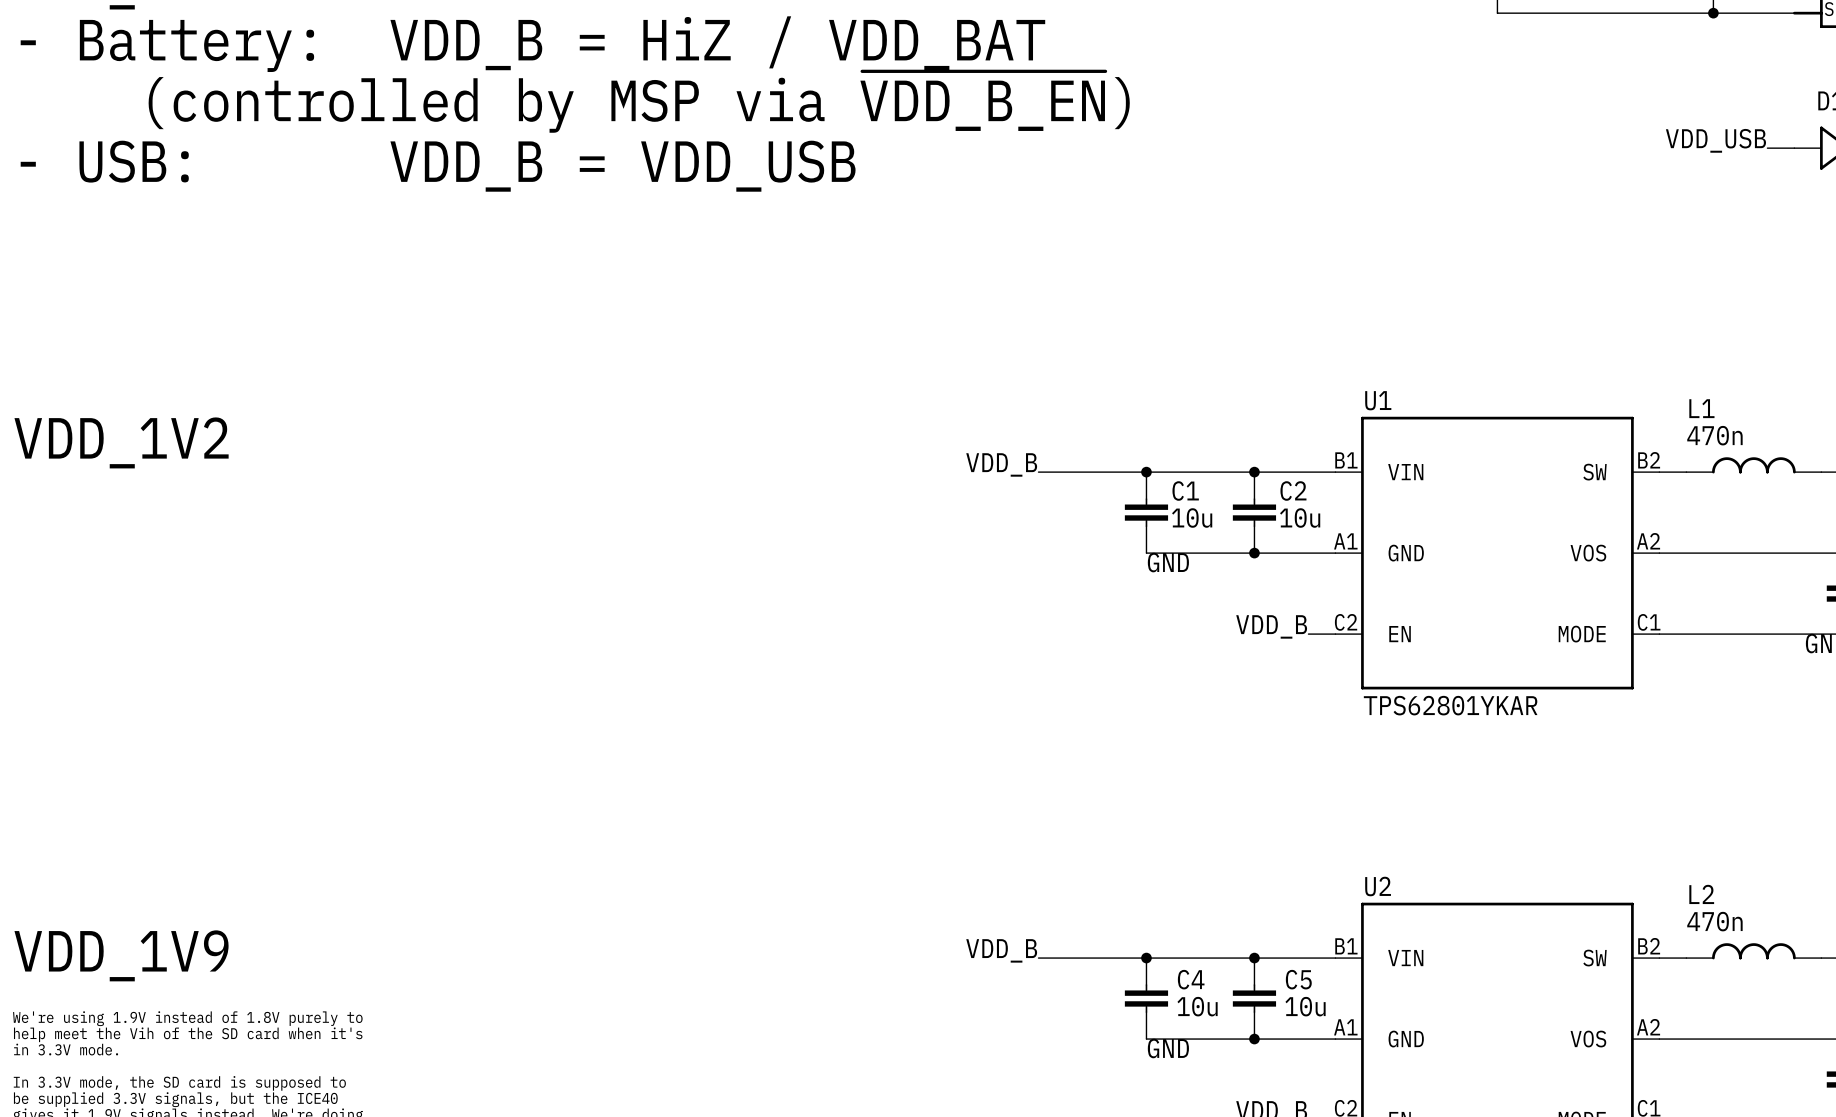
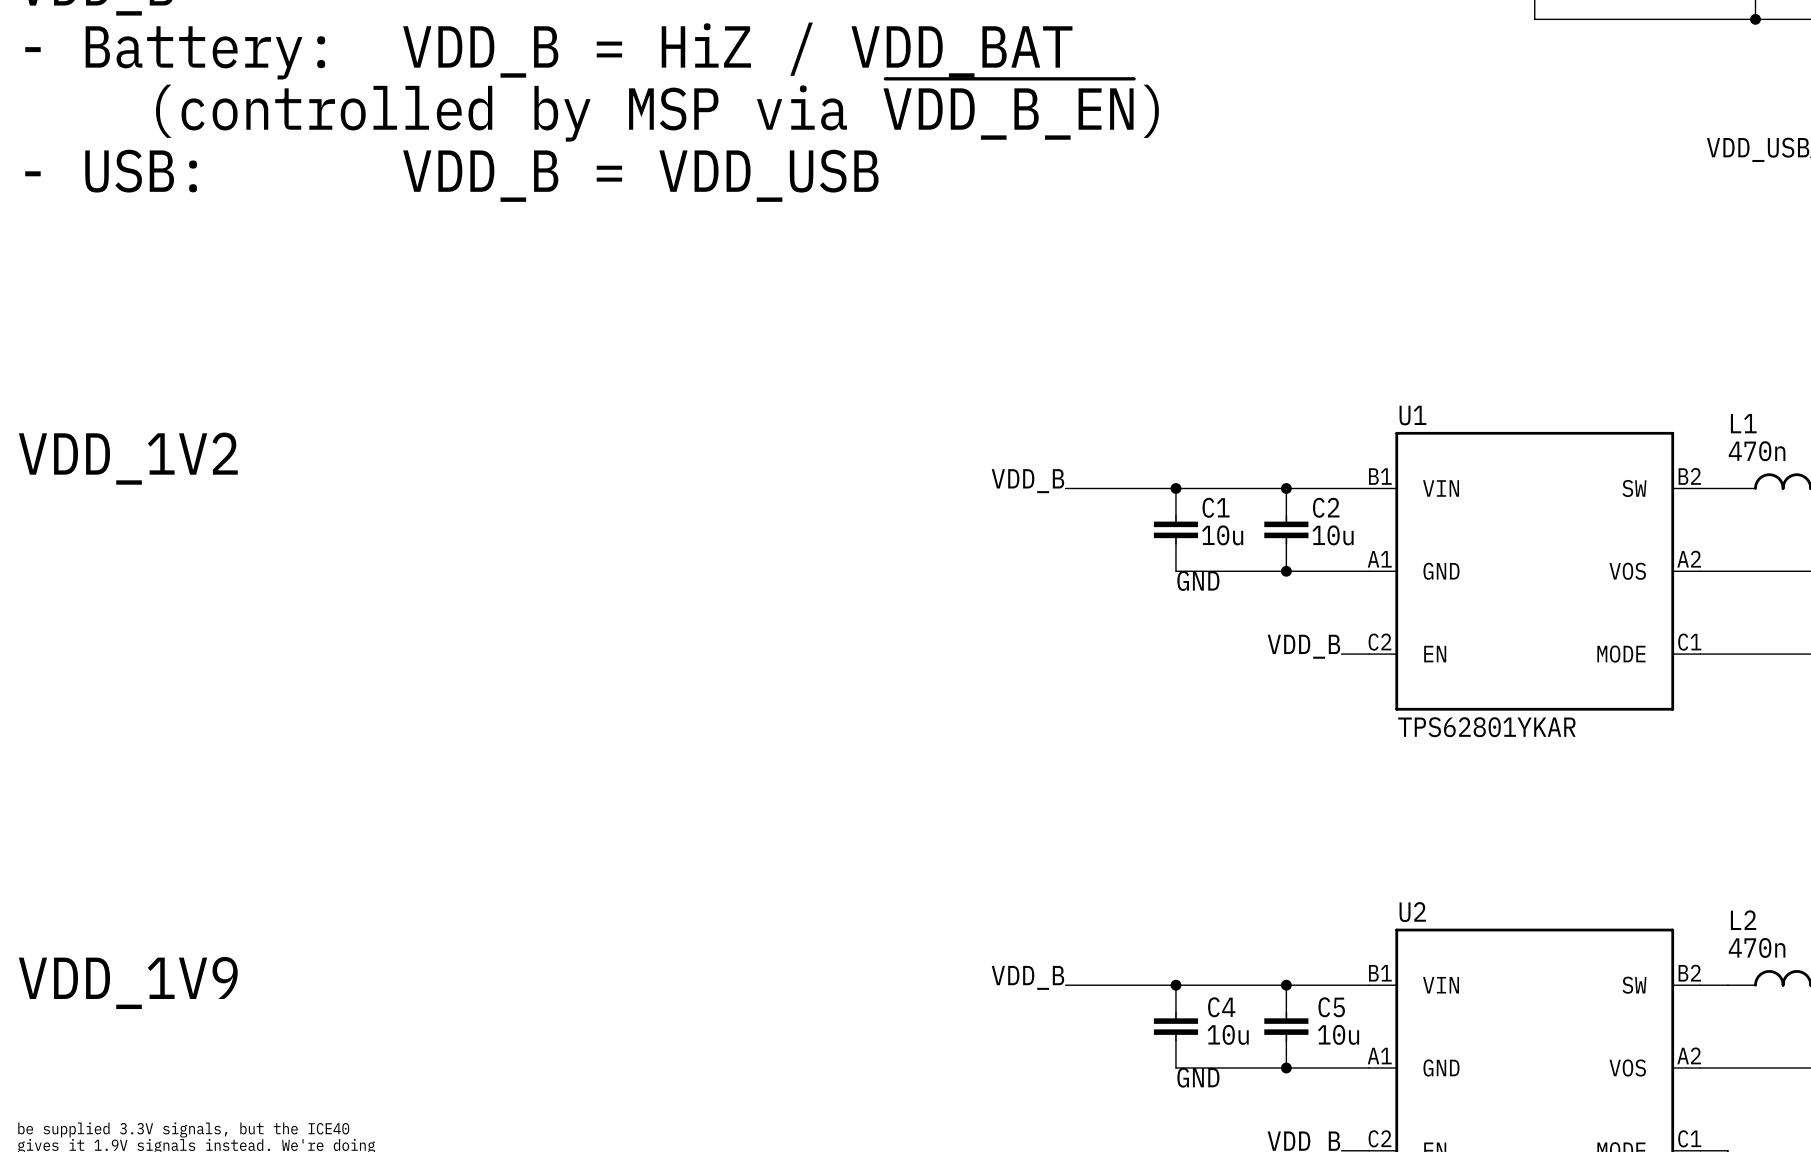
text: We're using 1.9V instead of 1.8V purely to (187, 1018) -> none
text: help meet the Vih of the SD card when it's (188, 1034) -> none
text: in 3.3V mode. (66, 1049) -> none
text: In 3.3V mode, the SD card is supposed to (179, 1083) -> none

